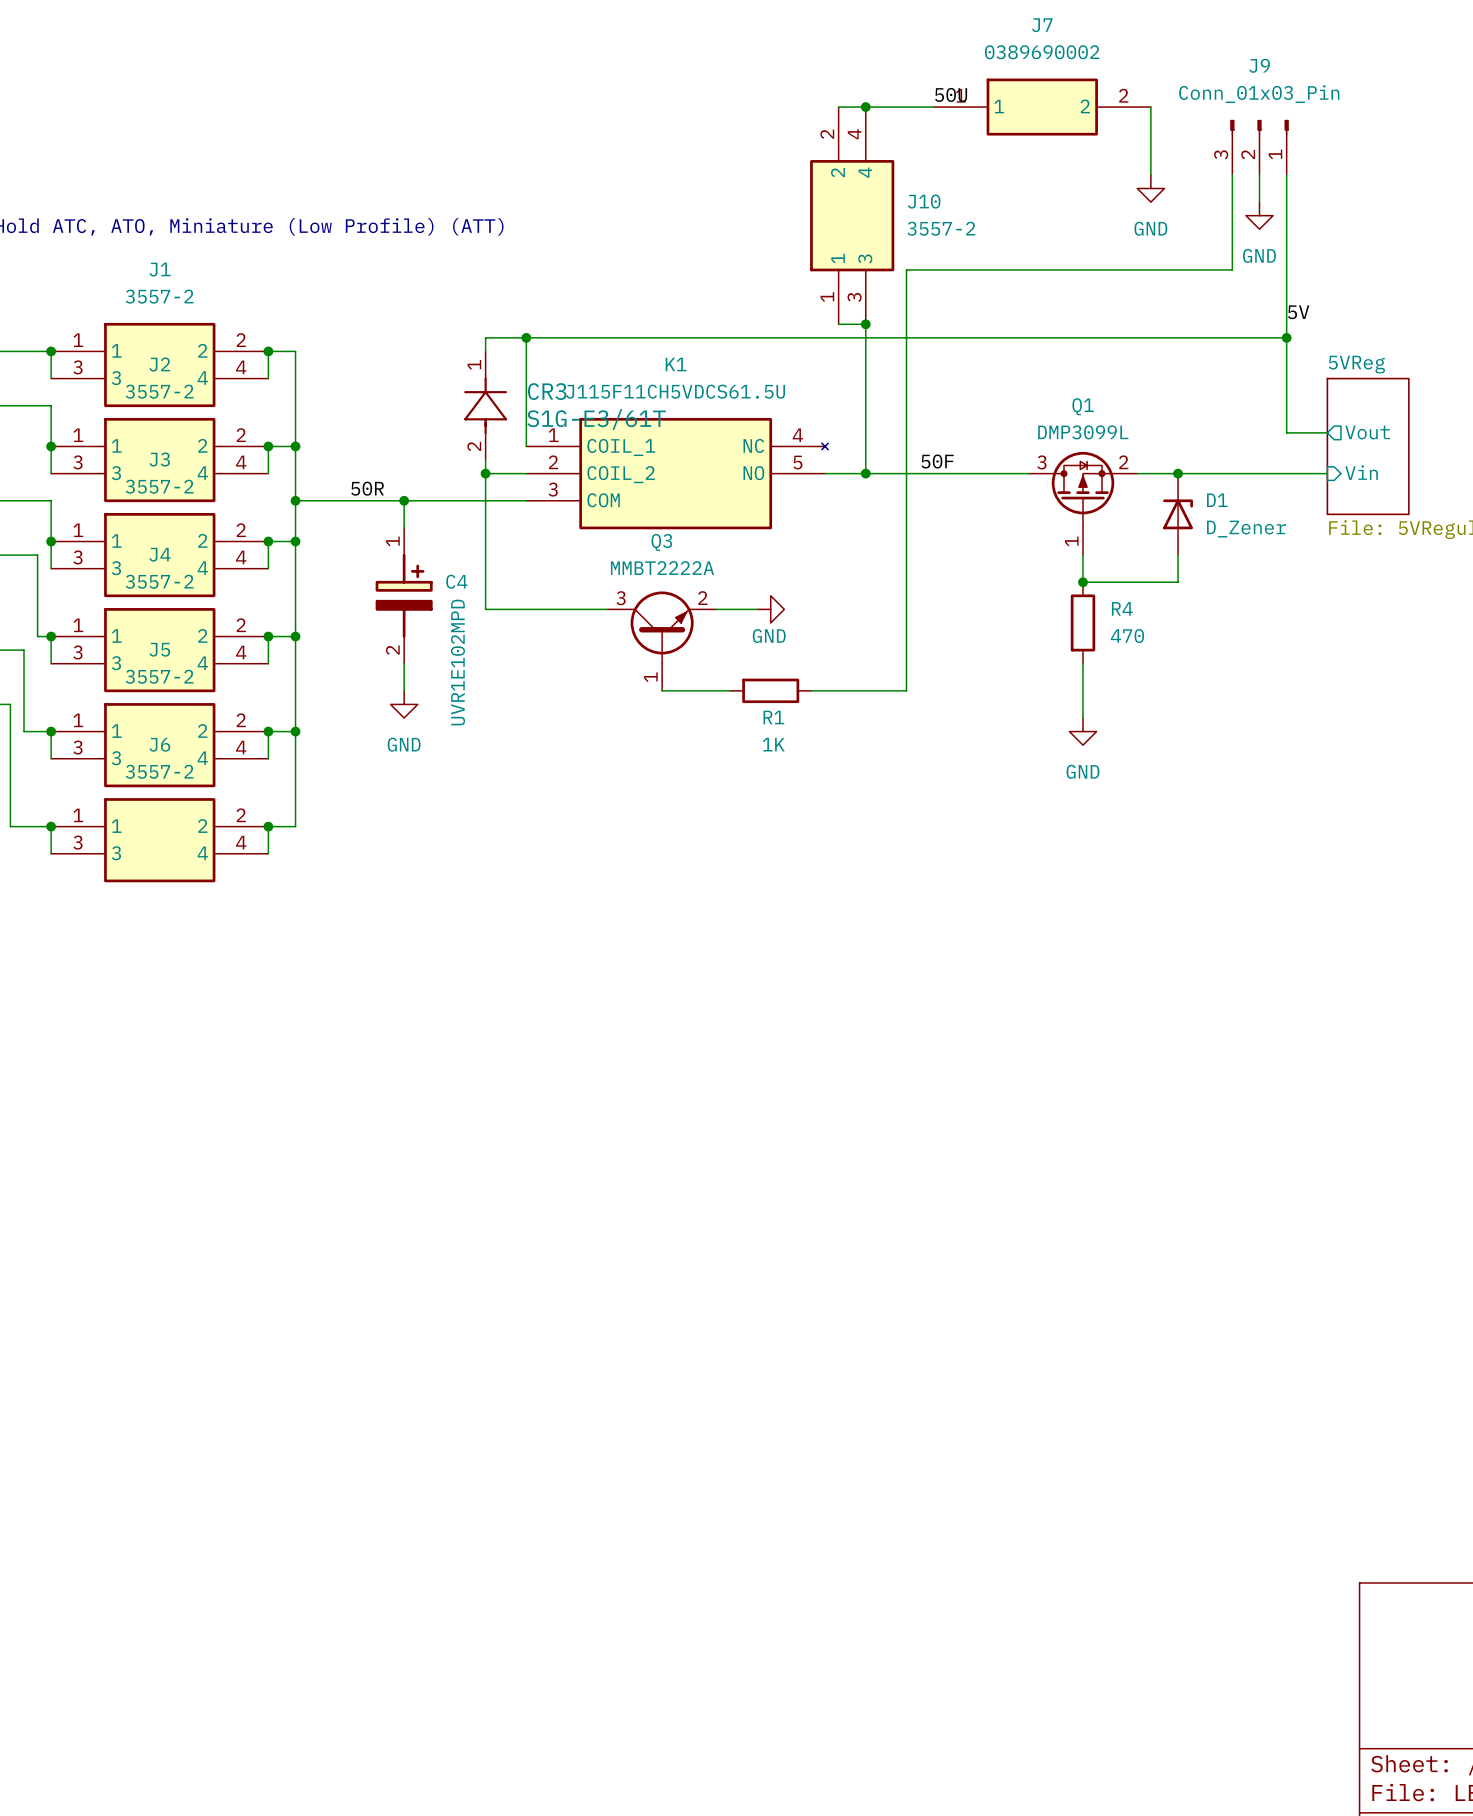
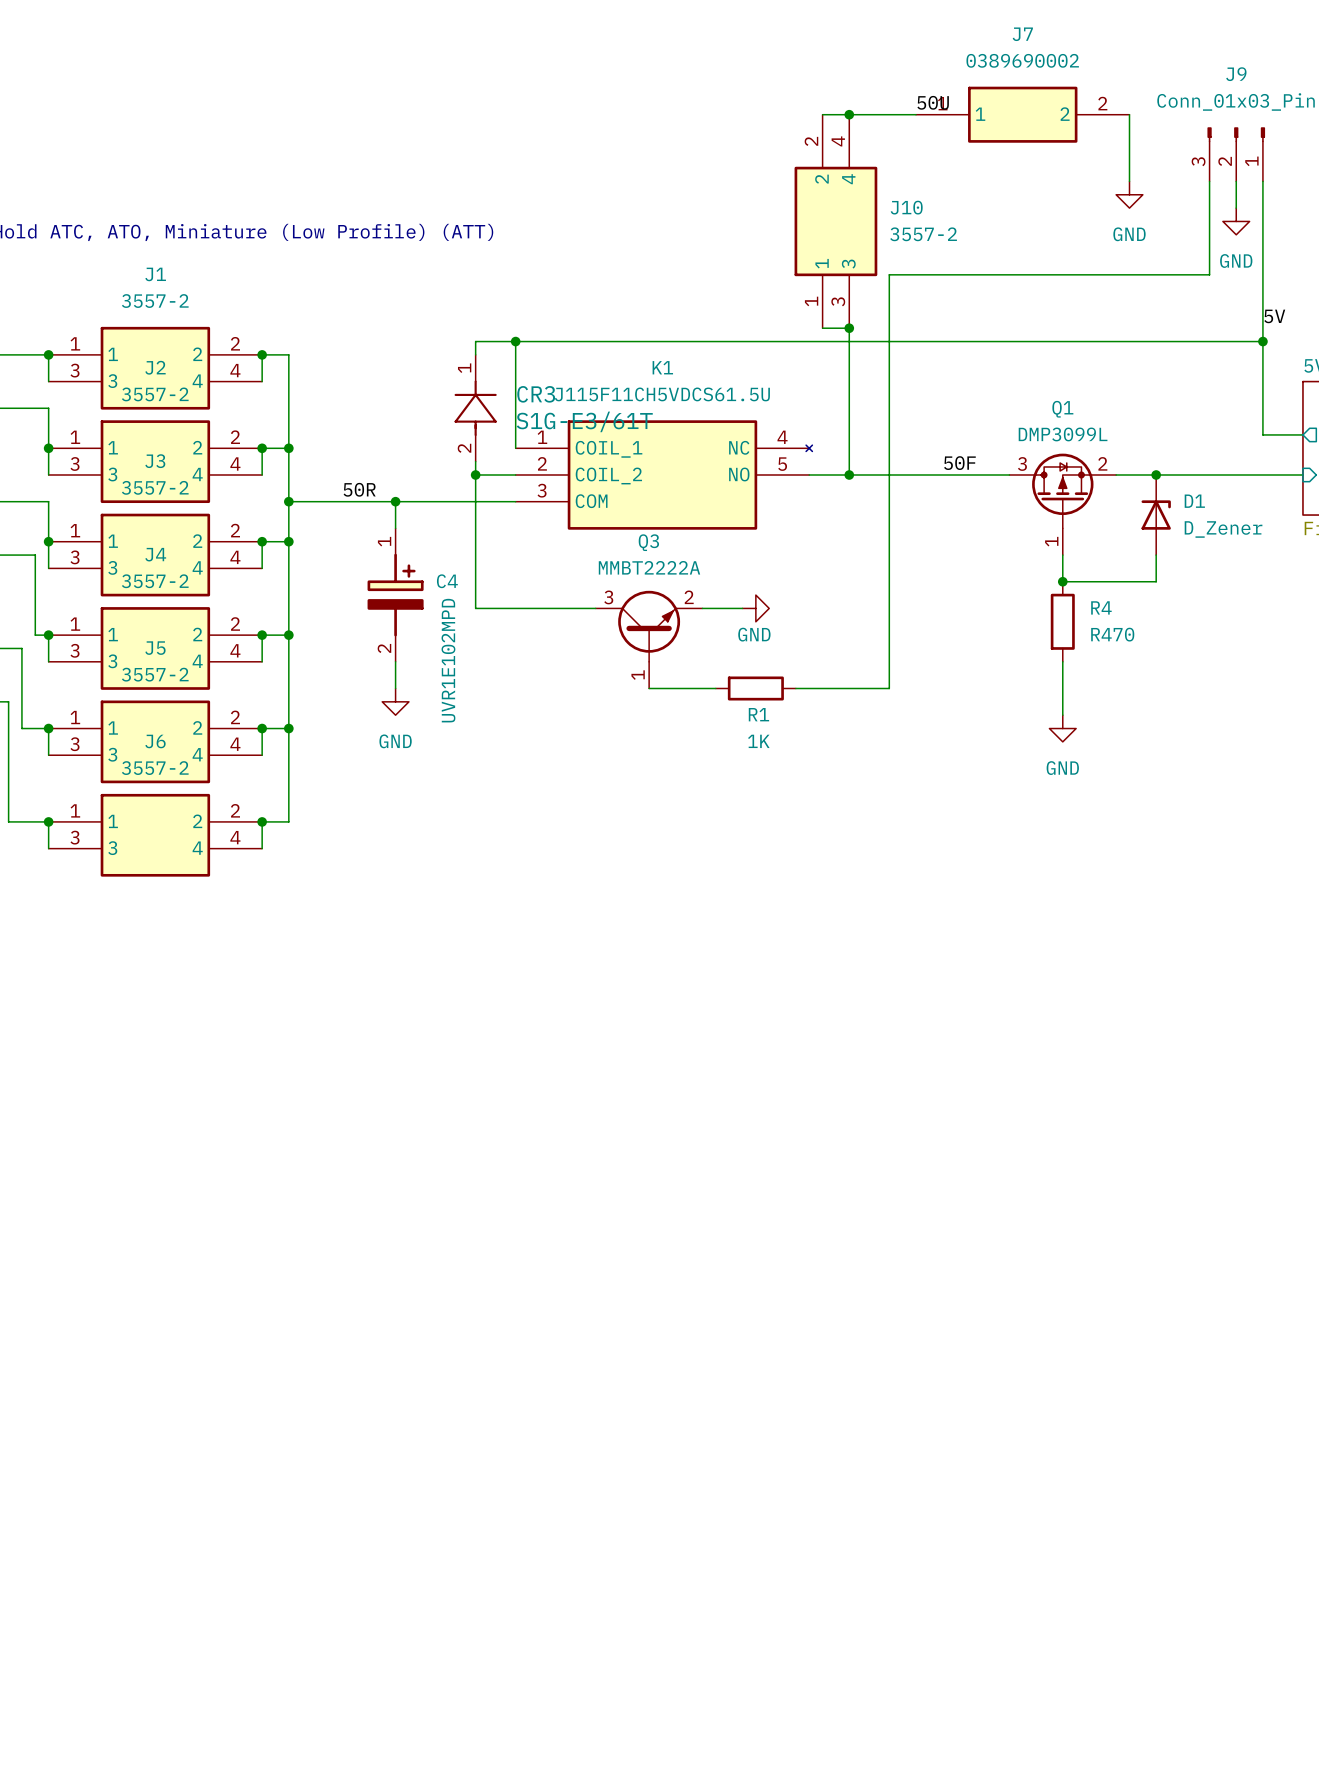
label position: 50F (937, 461) -> 50F (959, 463)
R4 value: 470 (1127, 636) -> R470 (1112, 634)

